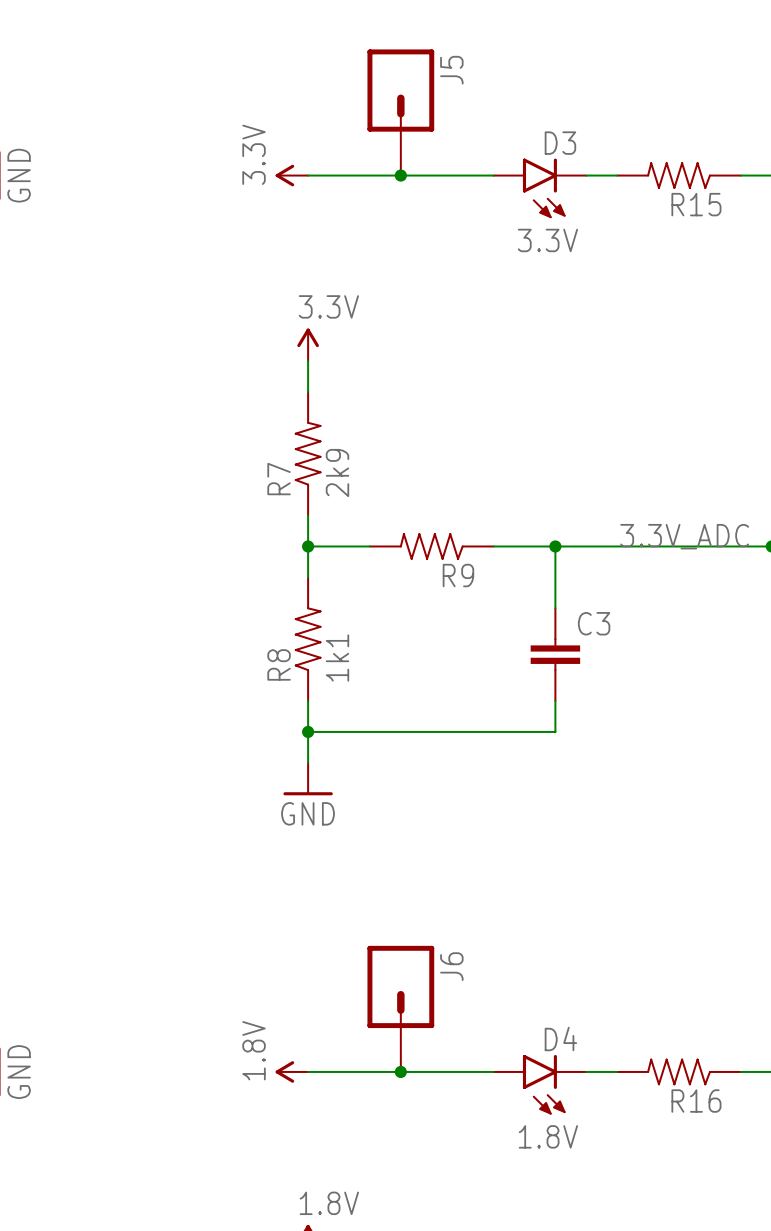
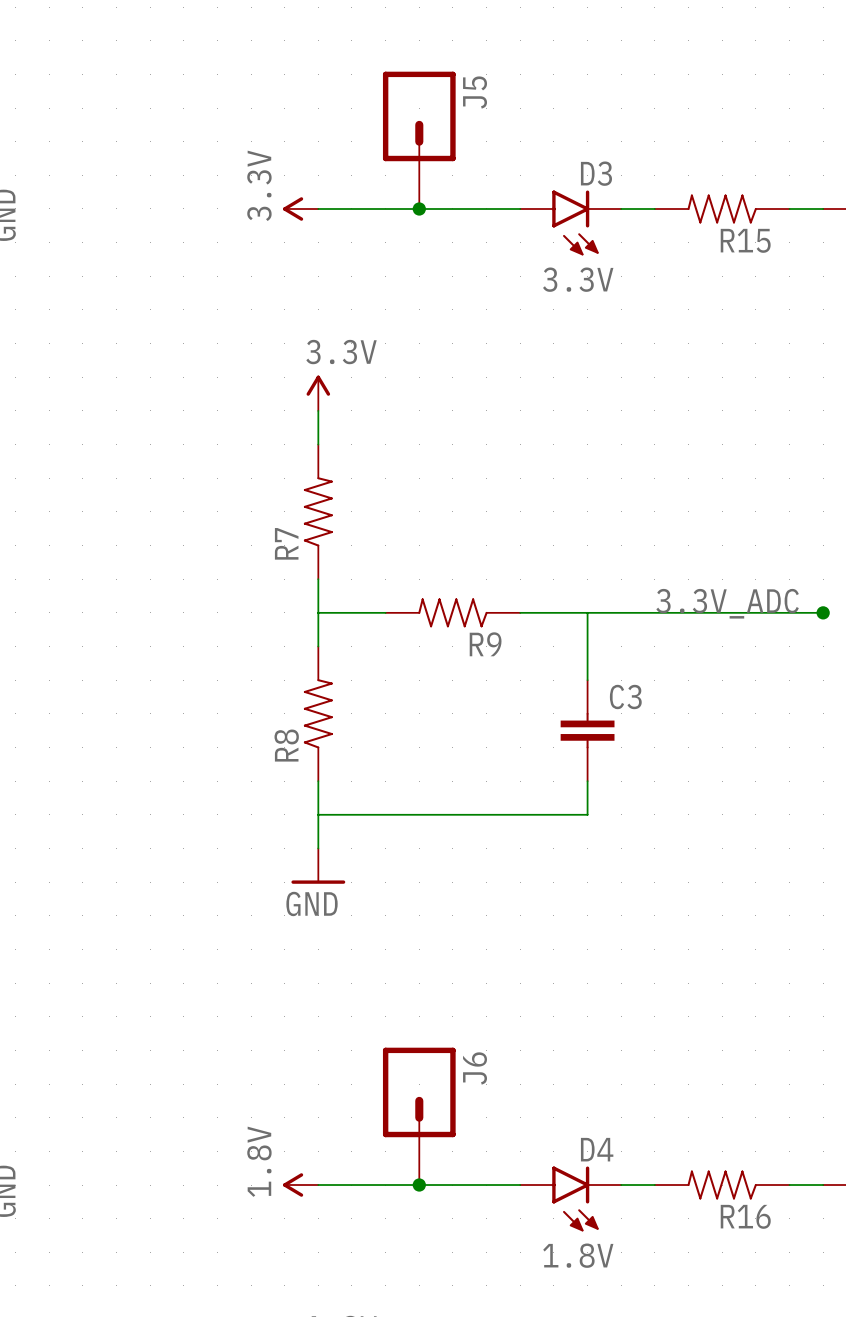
R7 value: 2k9 (337, 473) -> none
junction: (308, 546) -> none
junction: (555, 546) -> none
R8 value: 1k1 (337, 658) -> none
junction: (308, 731) -> none

